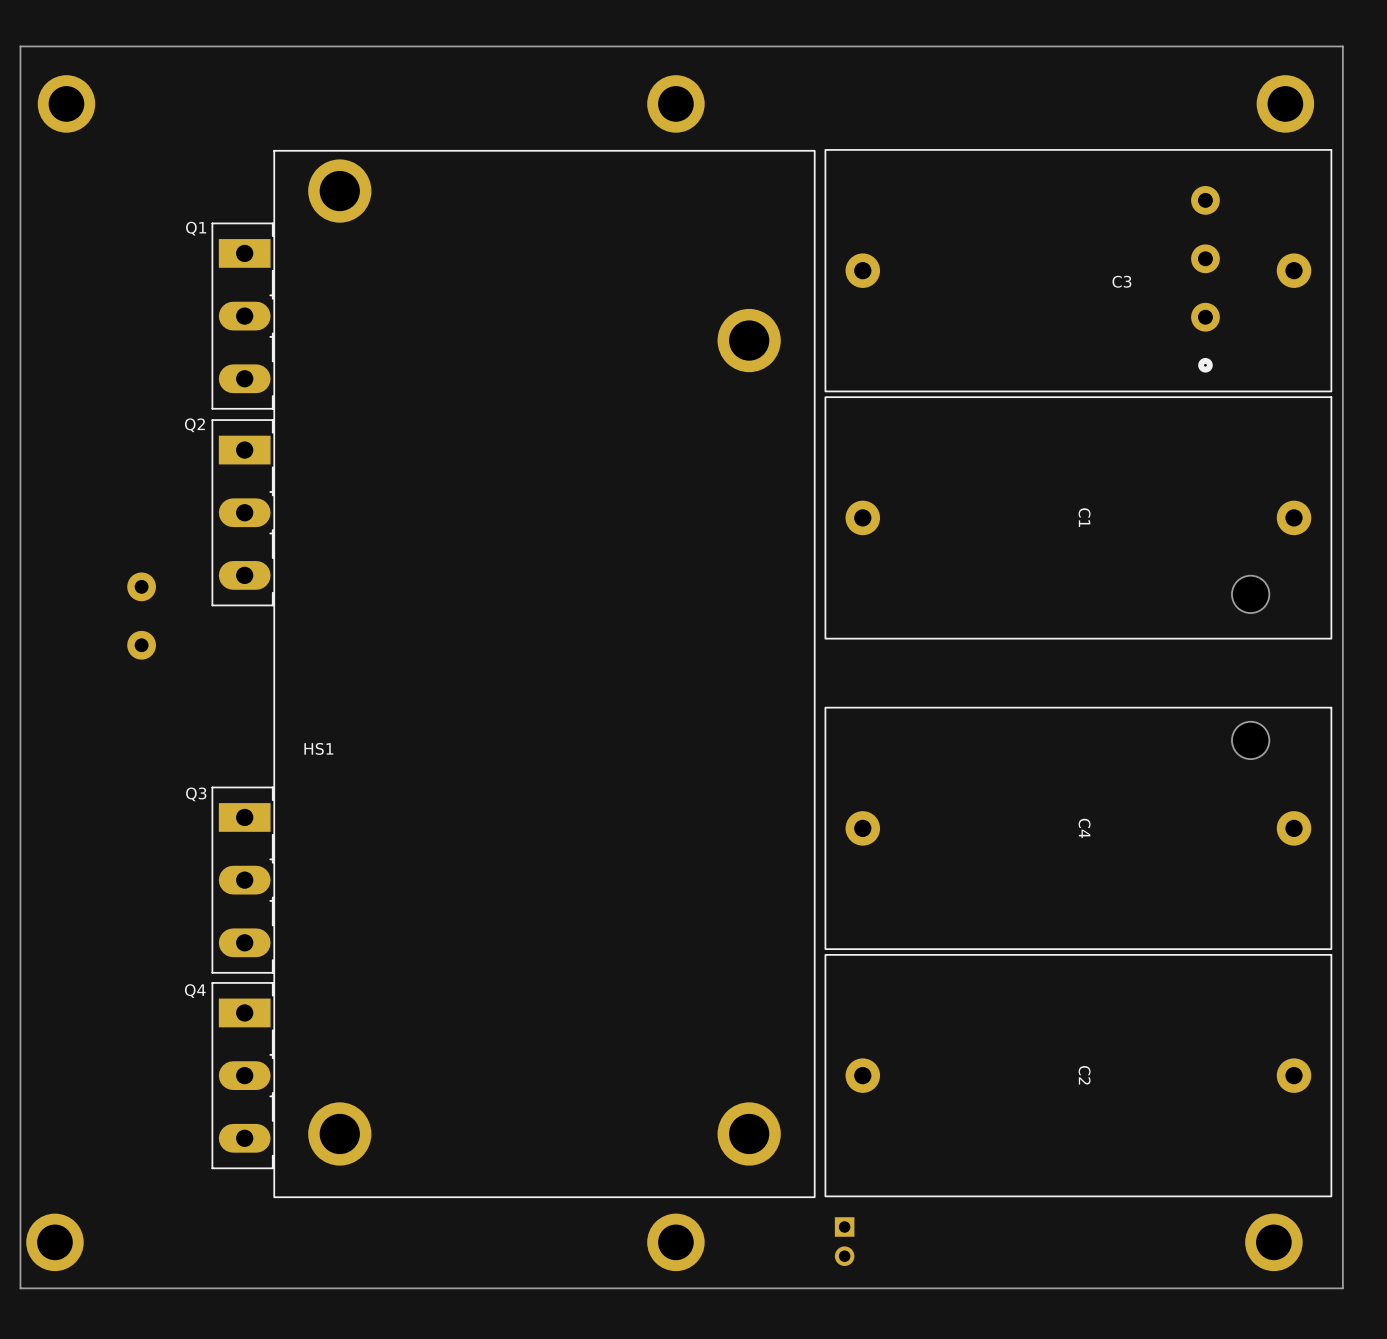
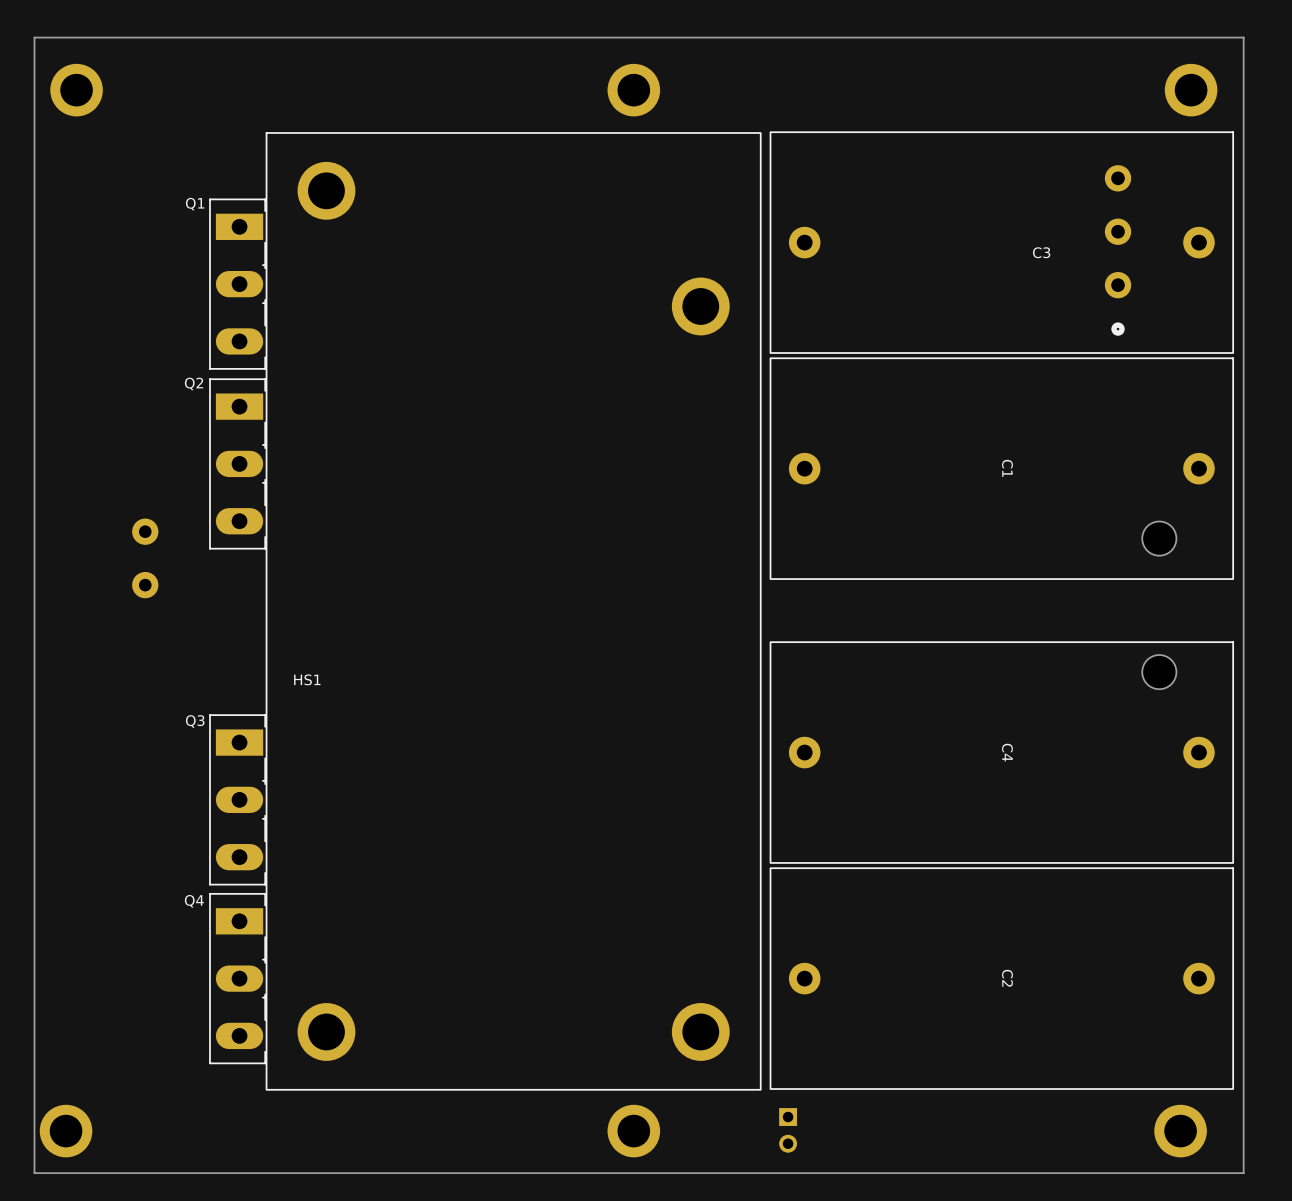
HS1 footprint: [273, 150, 816, 1198] -> [266, 132, 762, 1091]

